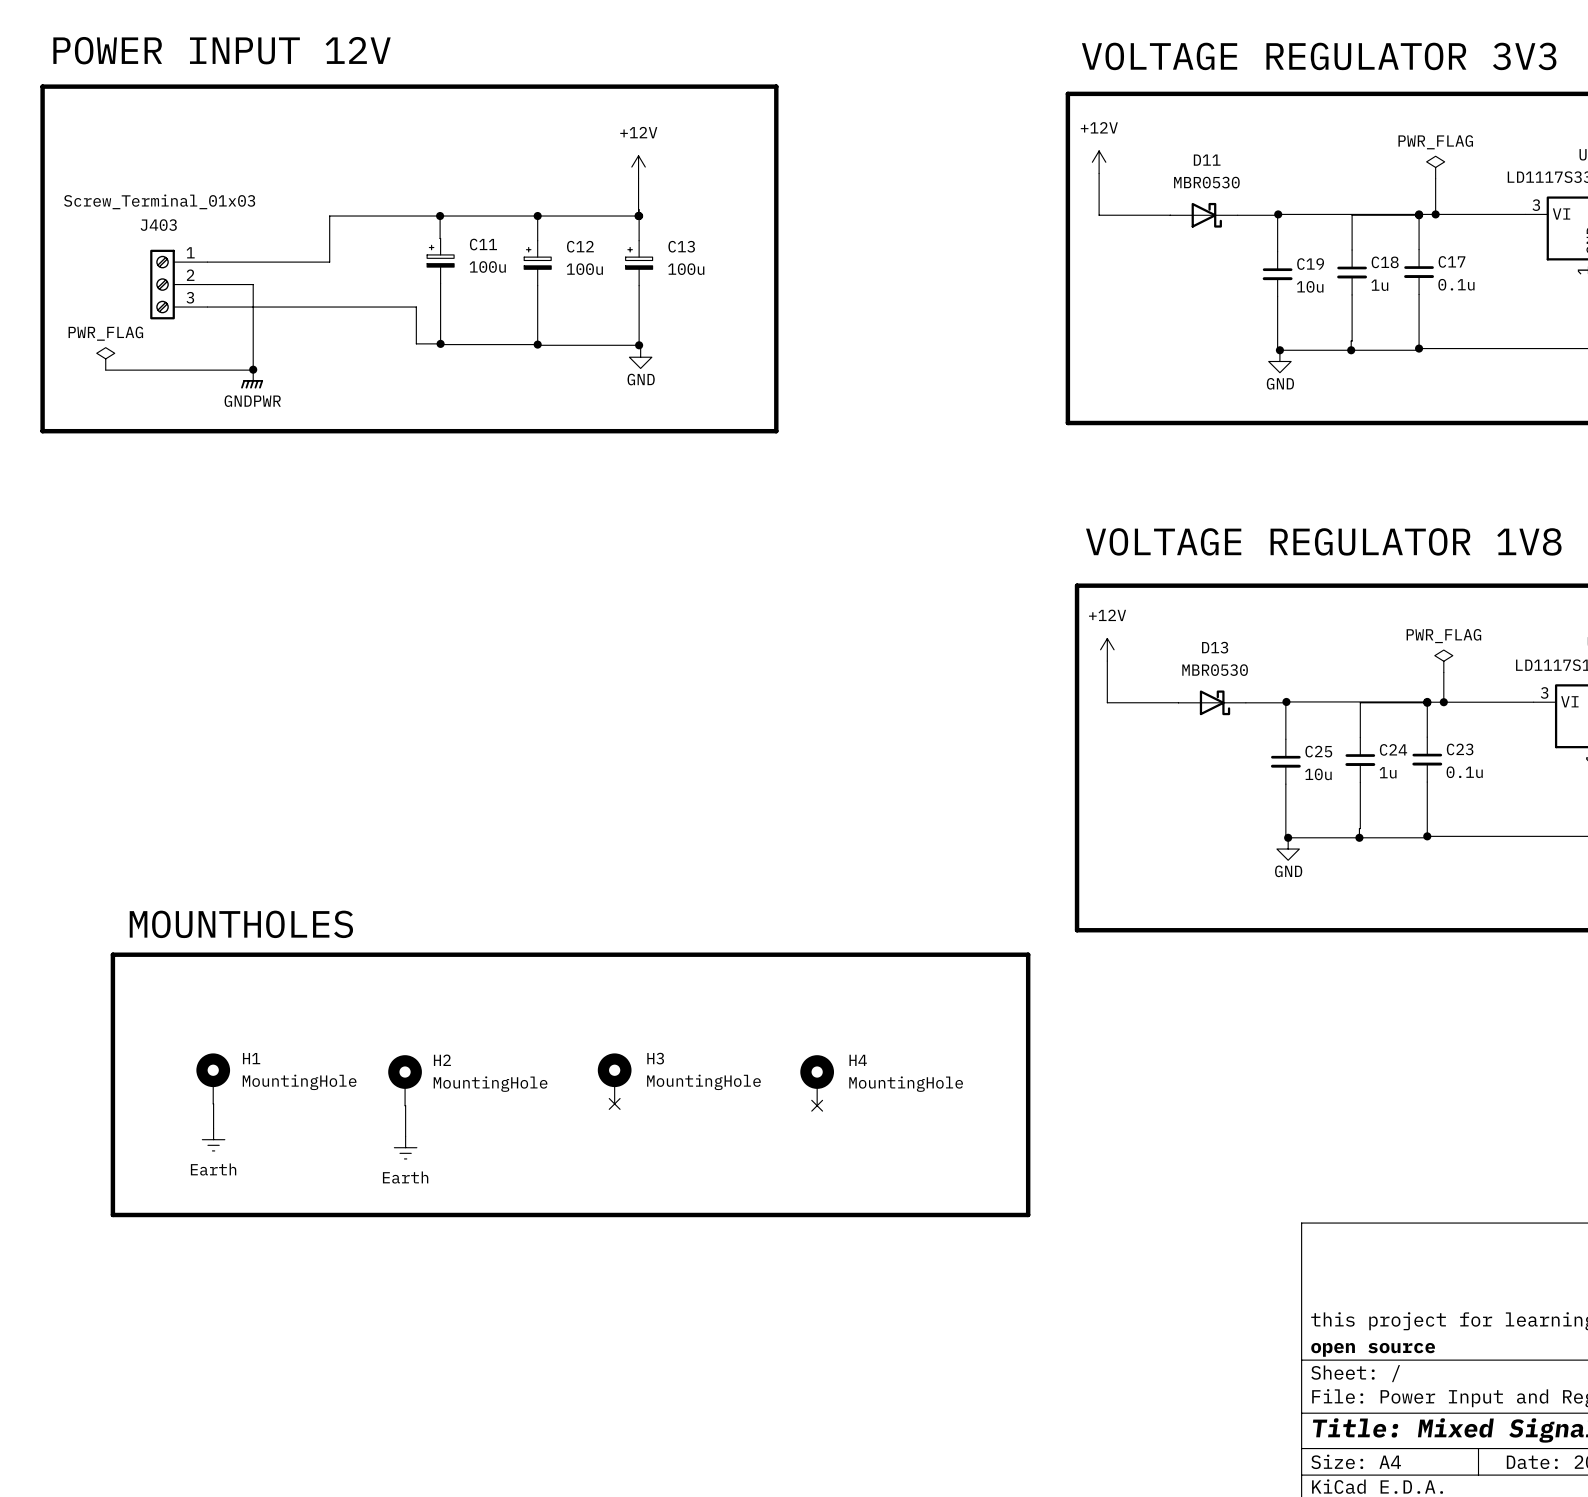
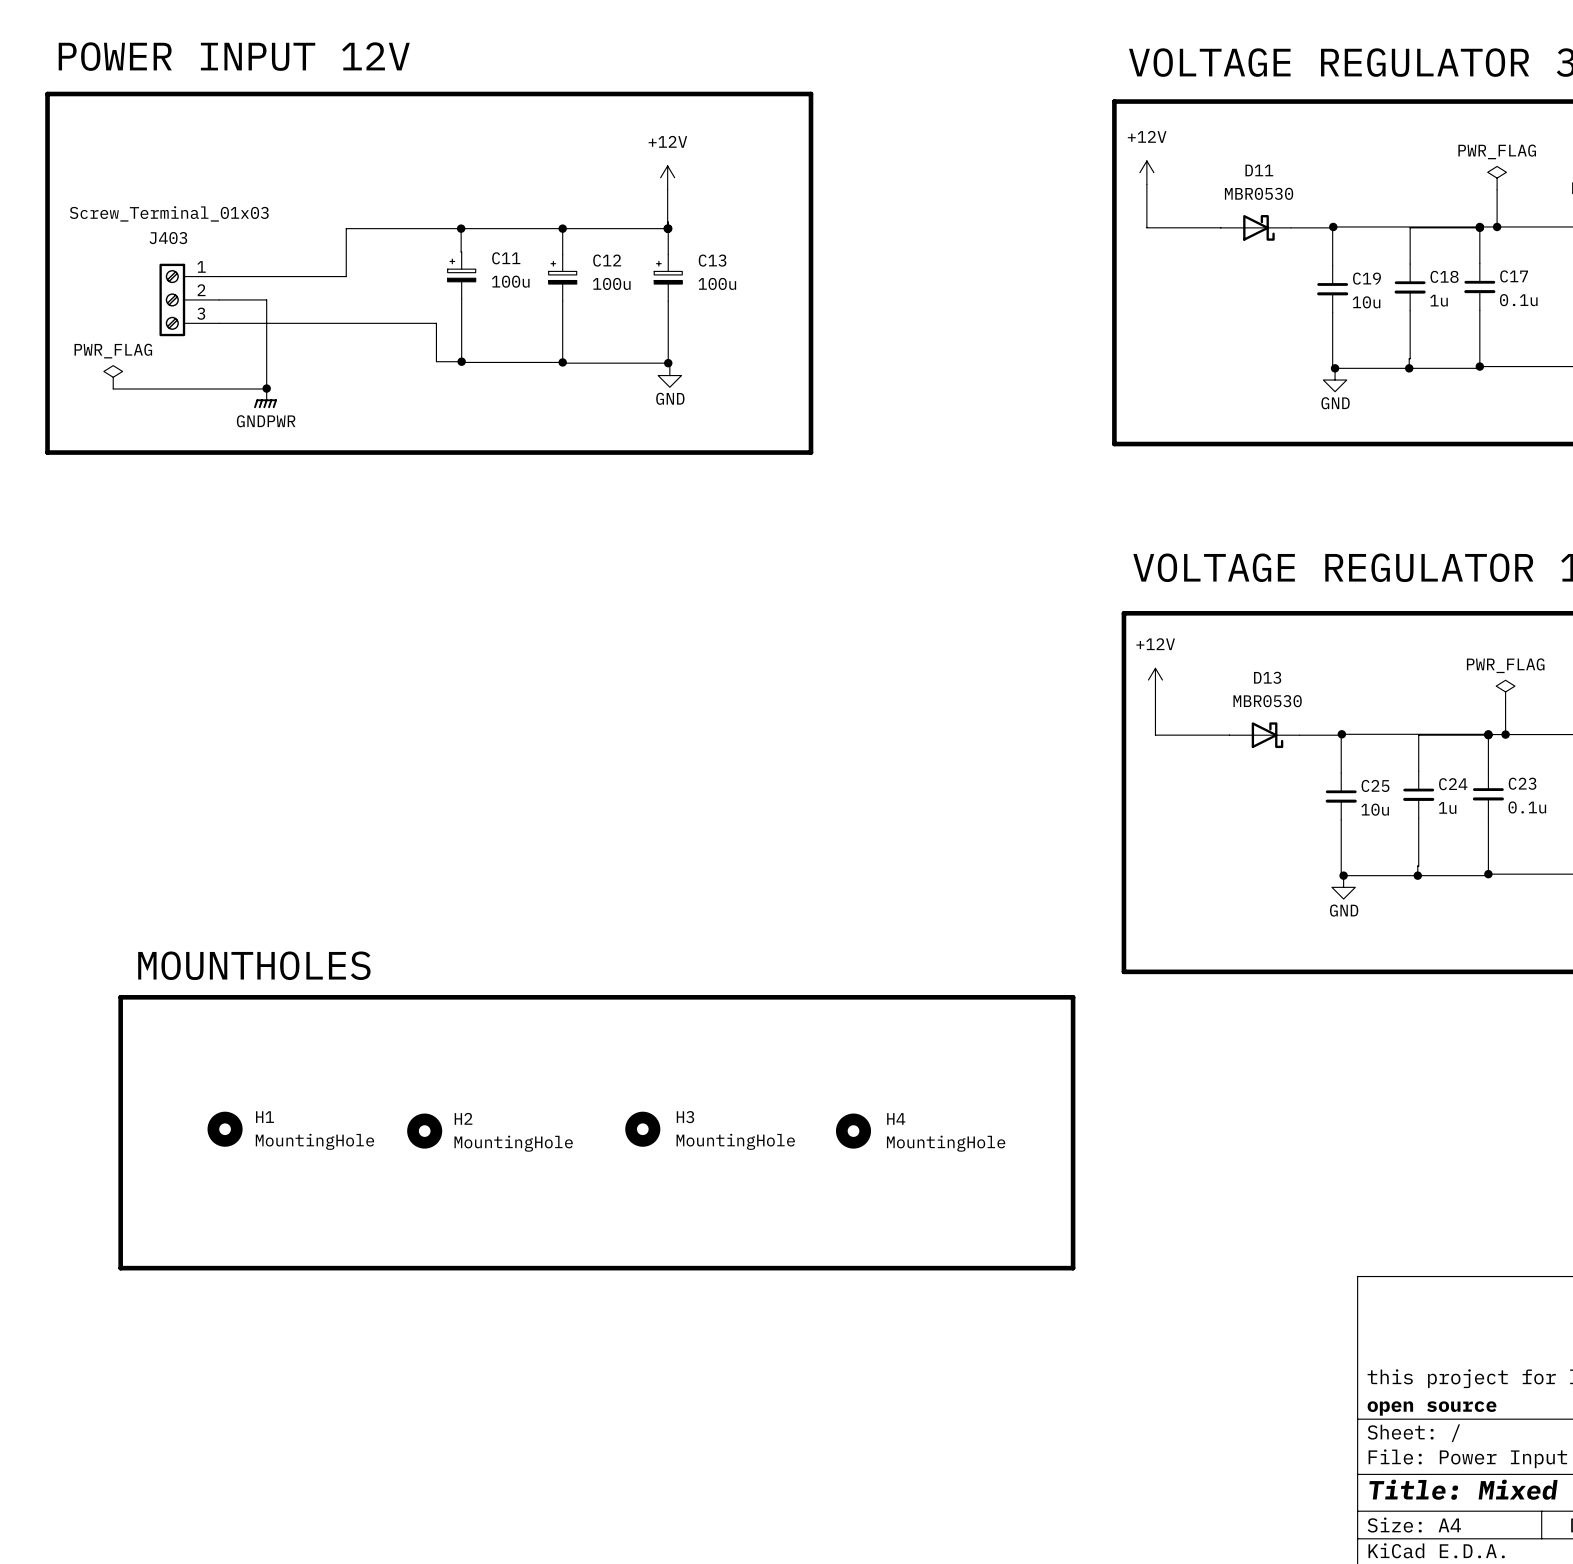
H1 symbol: [196, 1053, 231, 1104] -> [207, 1111, 243, 1147]
H3 symbol: [597, 1053, 632, 1104] -> [625, 1111, 661, 1147]
H2 symbol: [388, 1055, 422, 1106] -> [407, 1113, 443, 1149]
H4 symbol: [800, 1055, 835, 1106] -> [835, 1113, 872, 1149]
wire: (213, 1103) (213, 1128) -> none
no-connect mark: (614, 1103) -> none
wire: (405, 1105) (405, 1136) -> none
no-connect mark: (817, 1105) -> none
power symbol: Earth (213, 1139) -> none
power symbol: Earth (405, 1147) -> none

